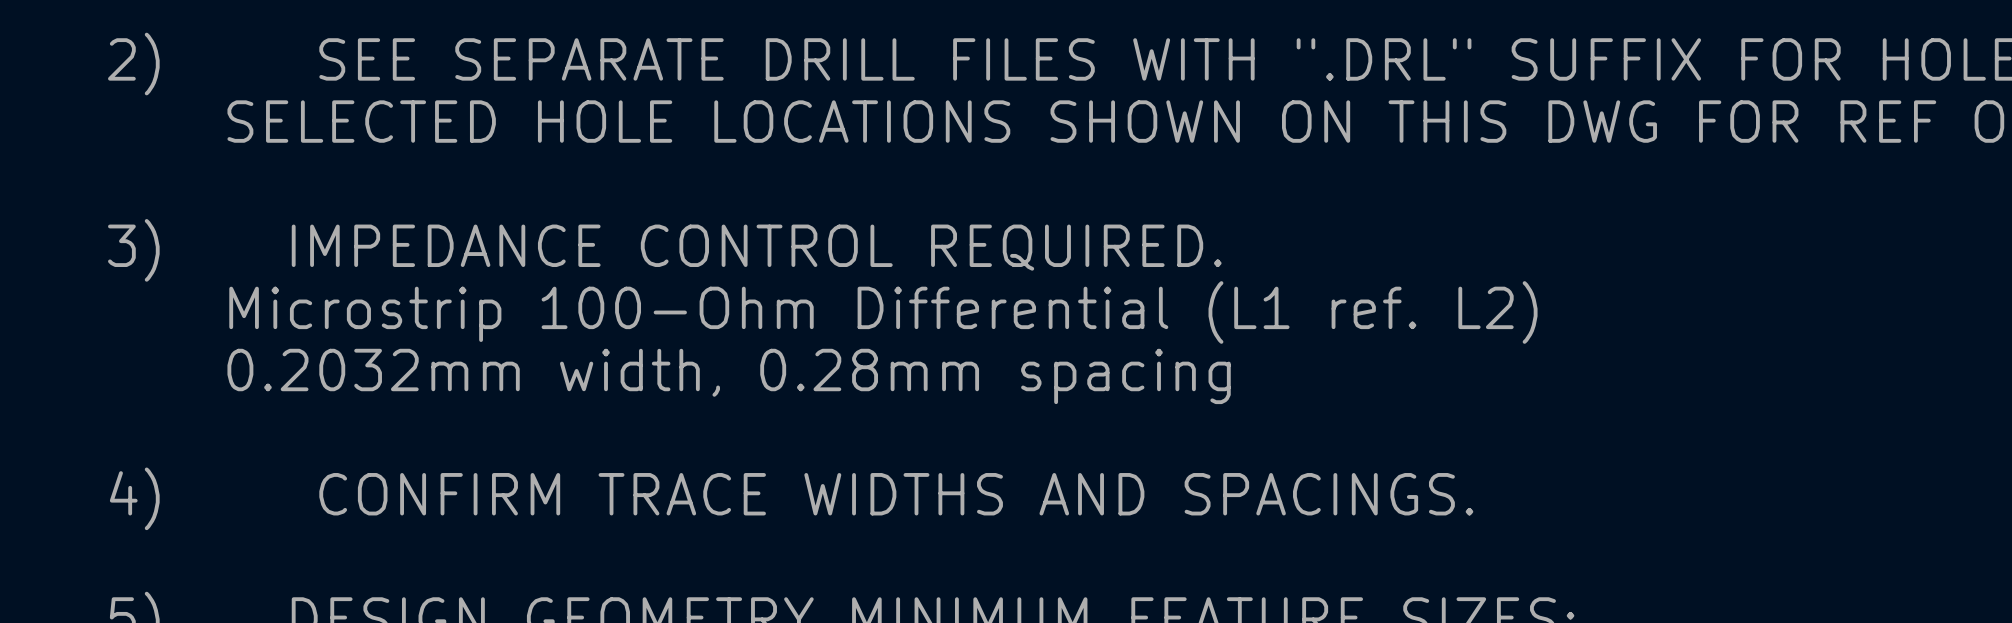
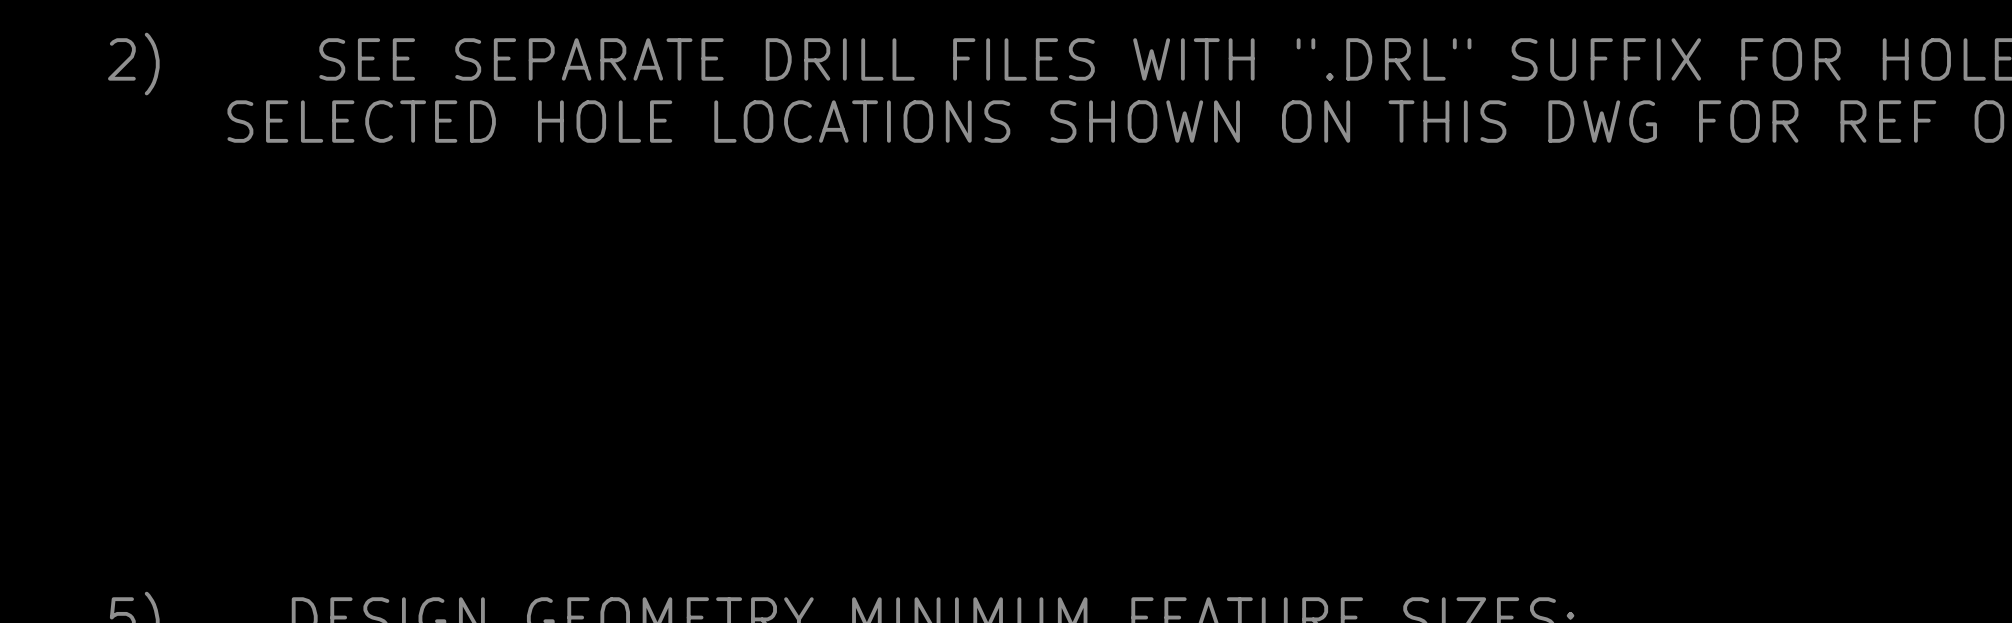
text: 3) IMPEDANCE CONTROL REQUIRED. (664, 250) -> none
text: Microstrip 100-Ohm Differential (L1 ref. L2) (883, 312) -> none
text: 0.2032mm width, 0.28mm spacing (729, 376) -> none
text: 4) CONFIRM TRACE WIDTHS AND SPACINGS. (791, 498) -> none

